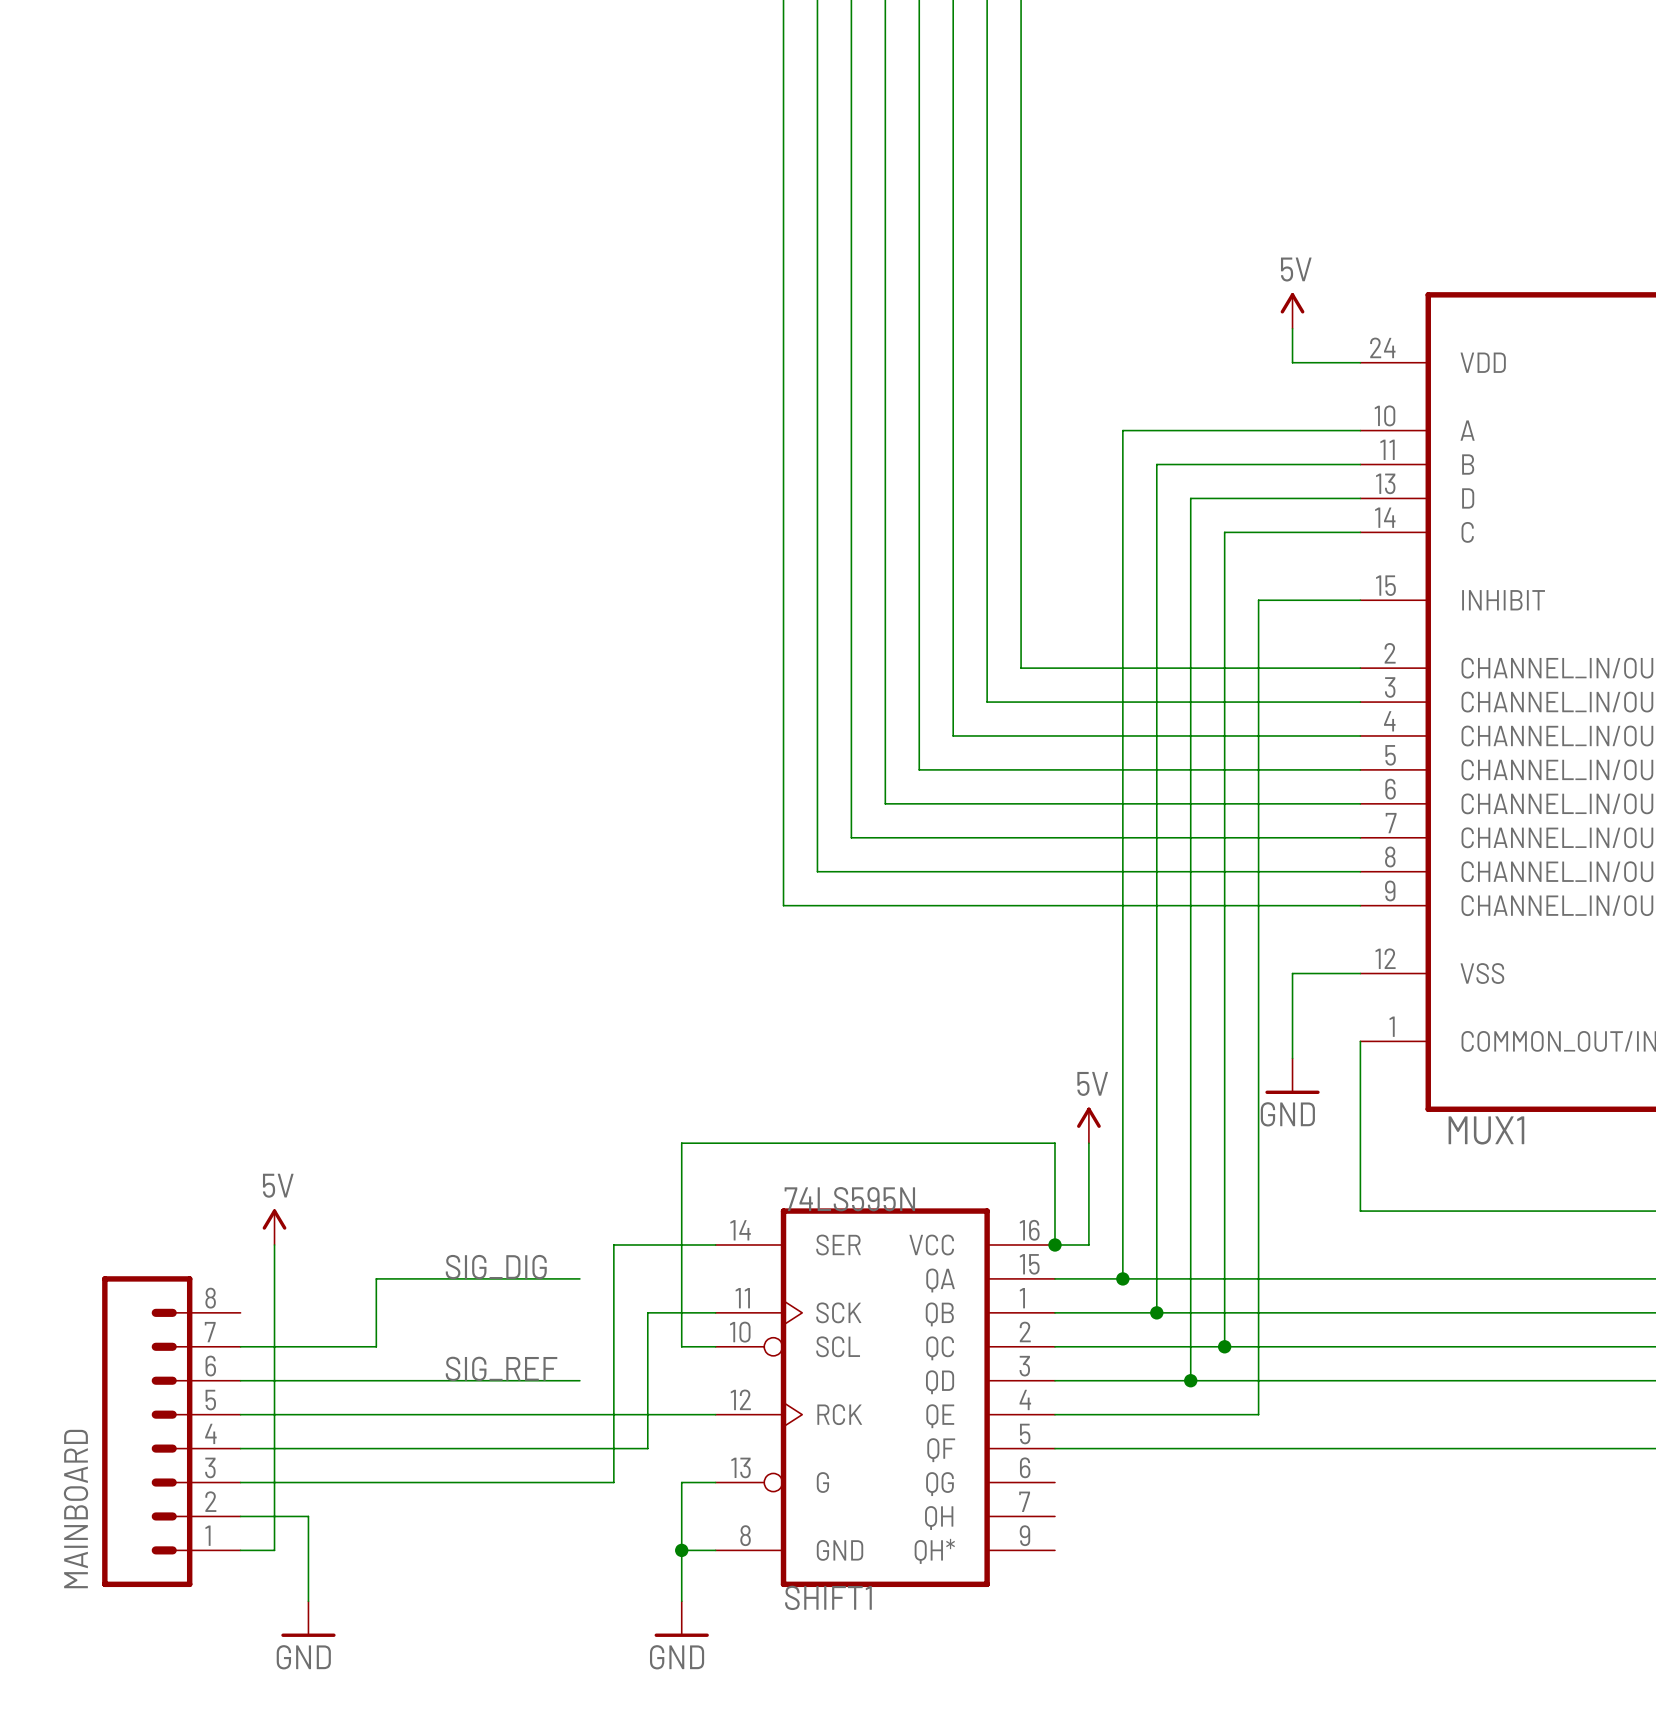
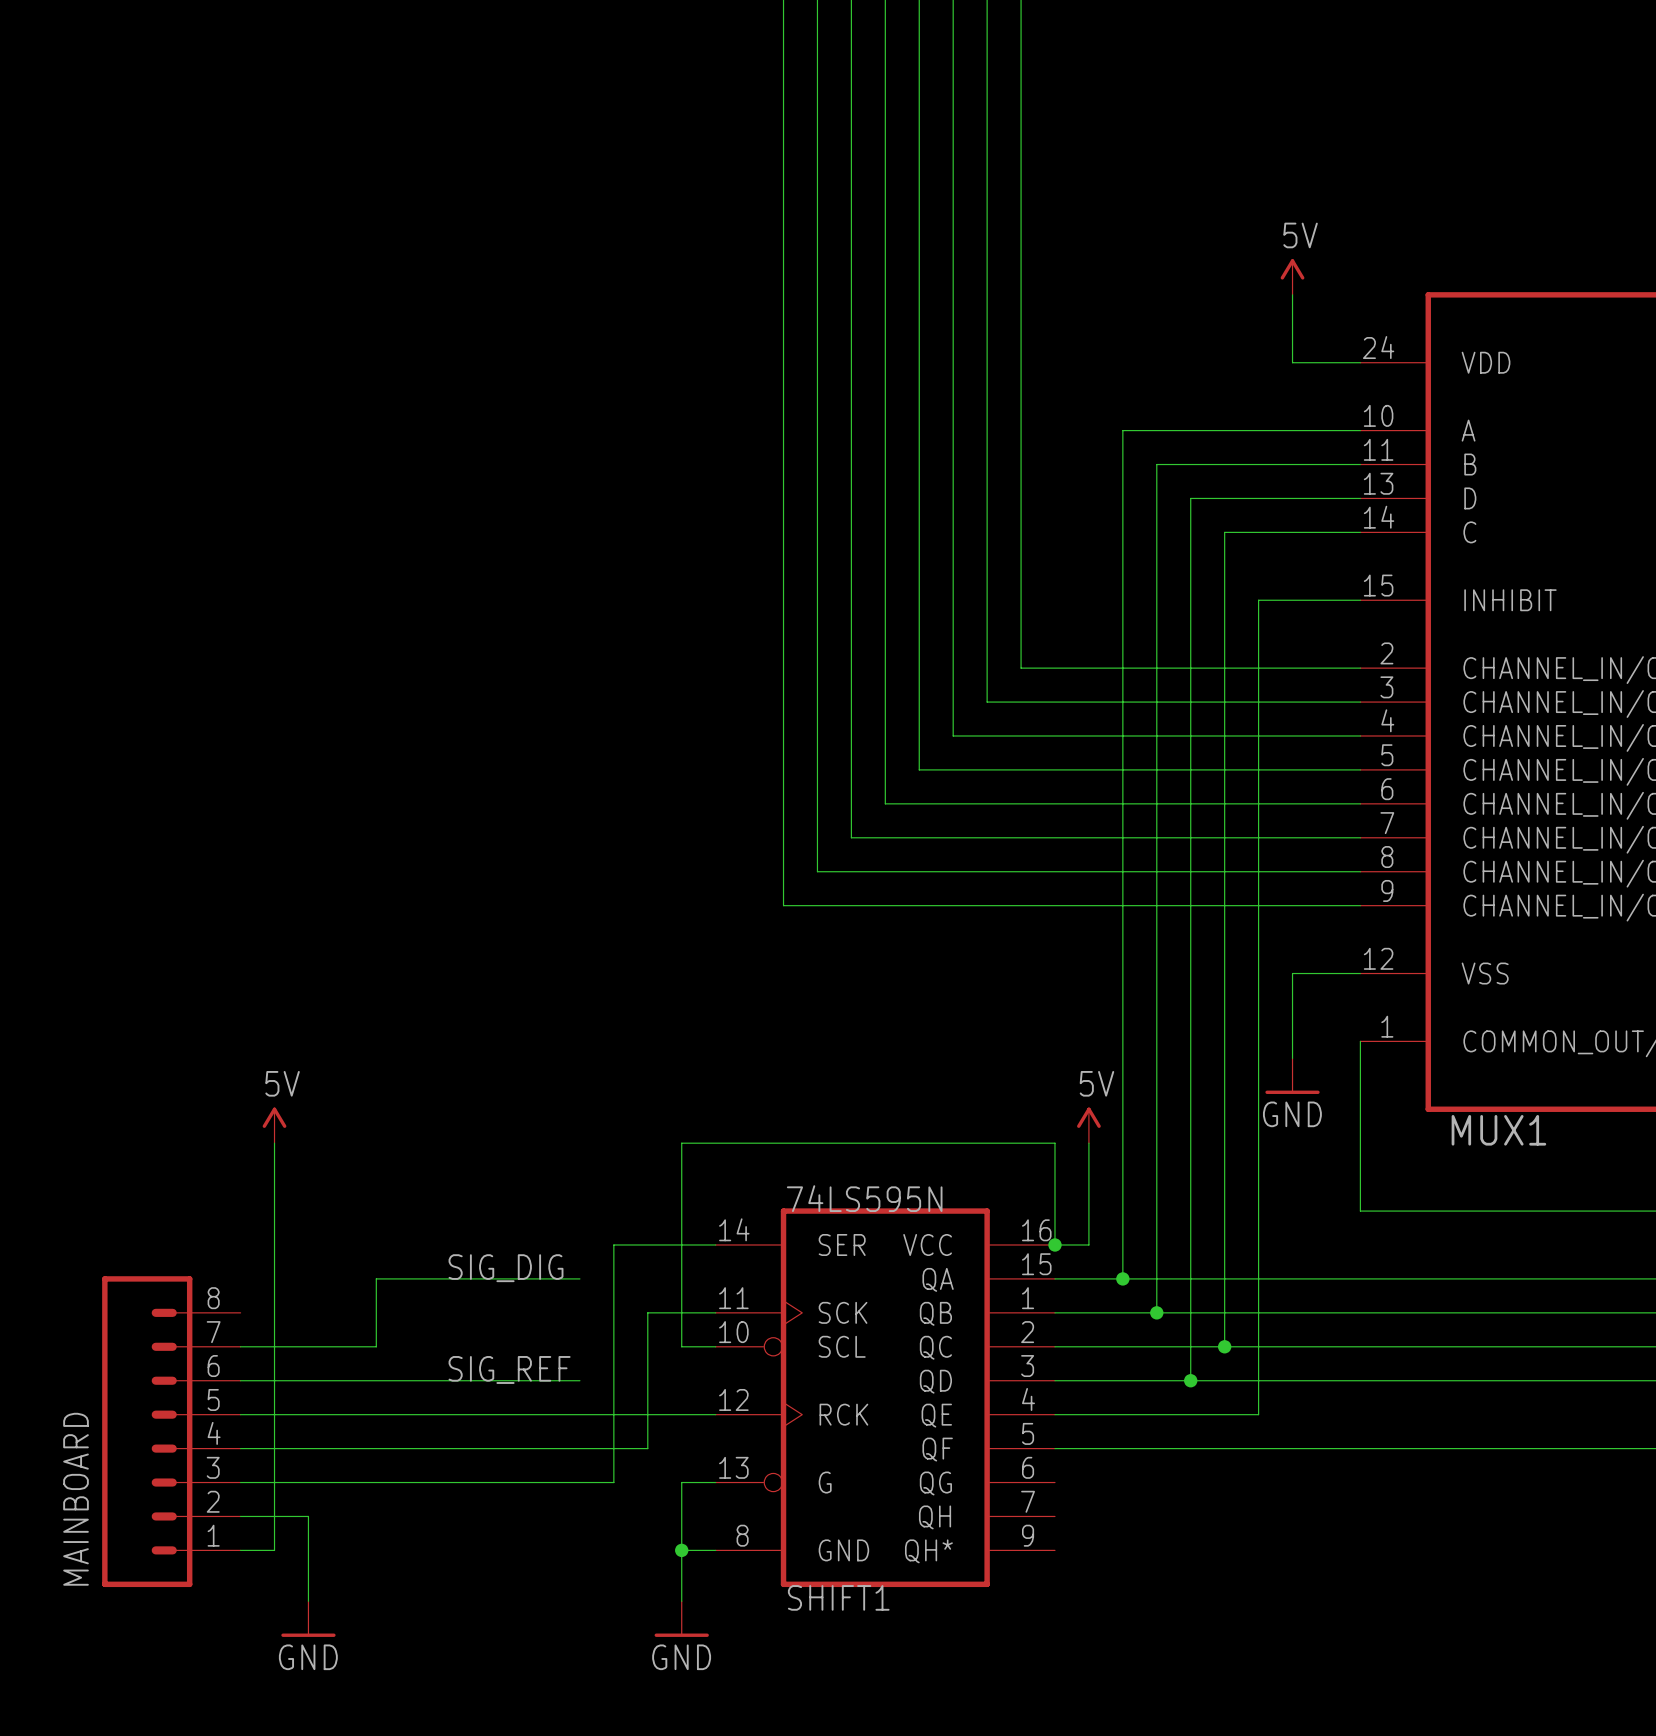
power symbol position: 5V (1292, 310) -> 5V (1292, 277)
wire: none -> (274, 1143) (274, 1244)
power symbol position: 5V (274, 1227) -> 5V (274, 1125)

